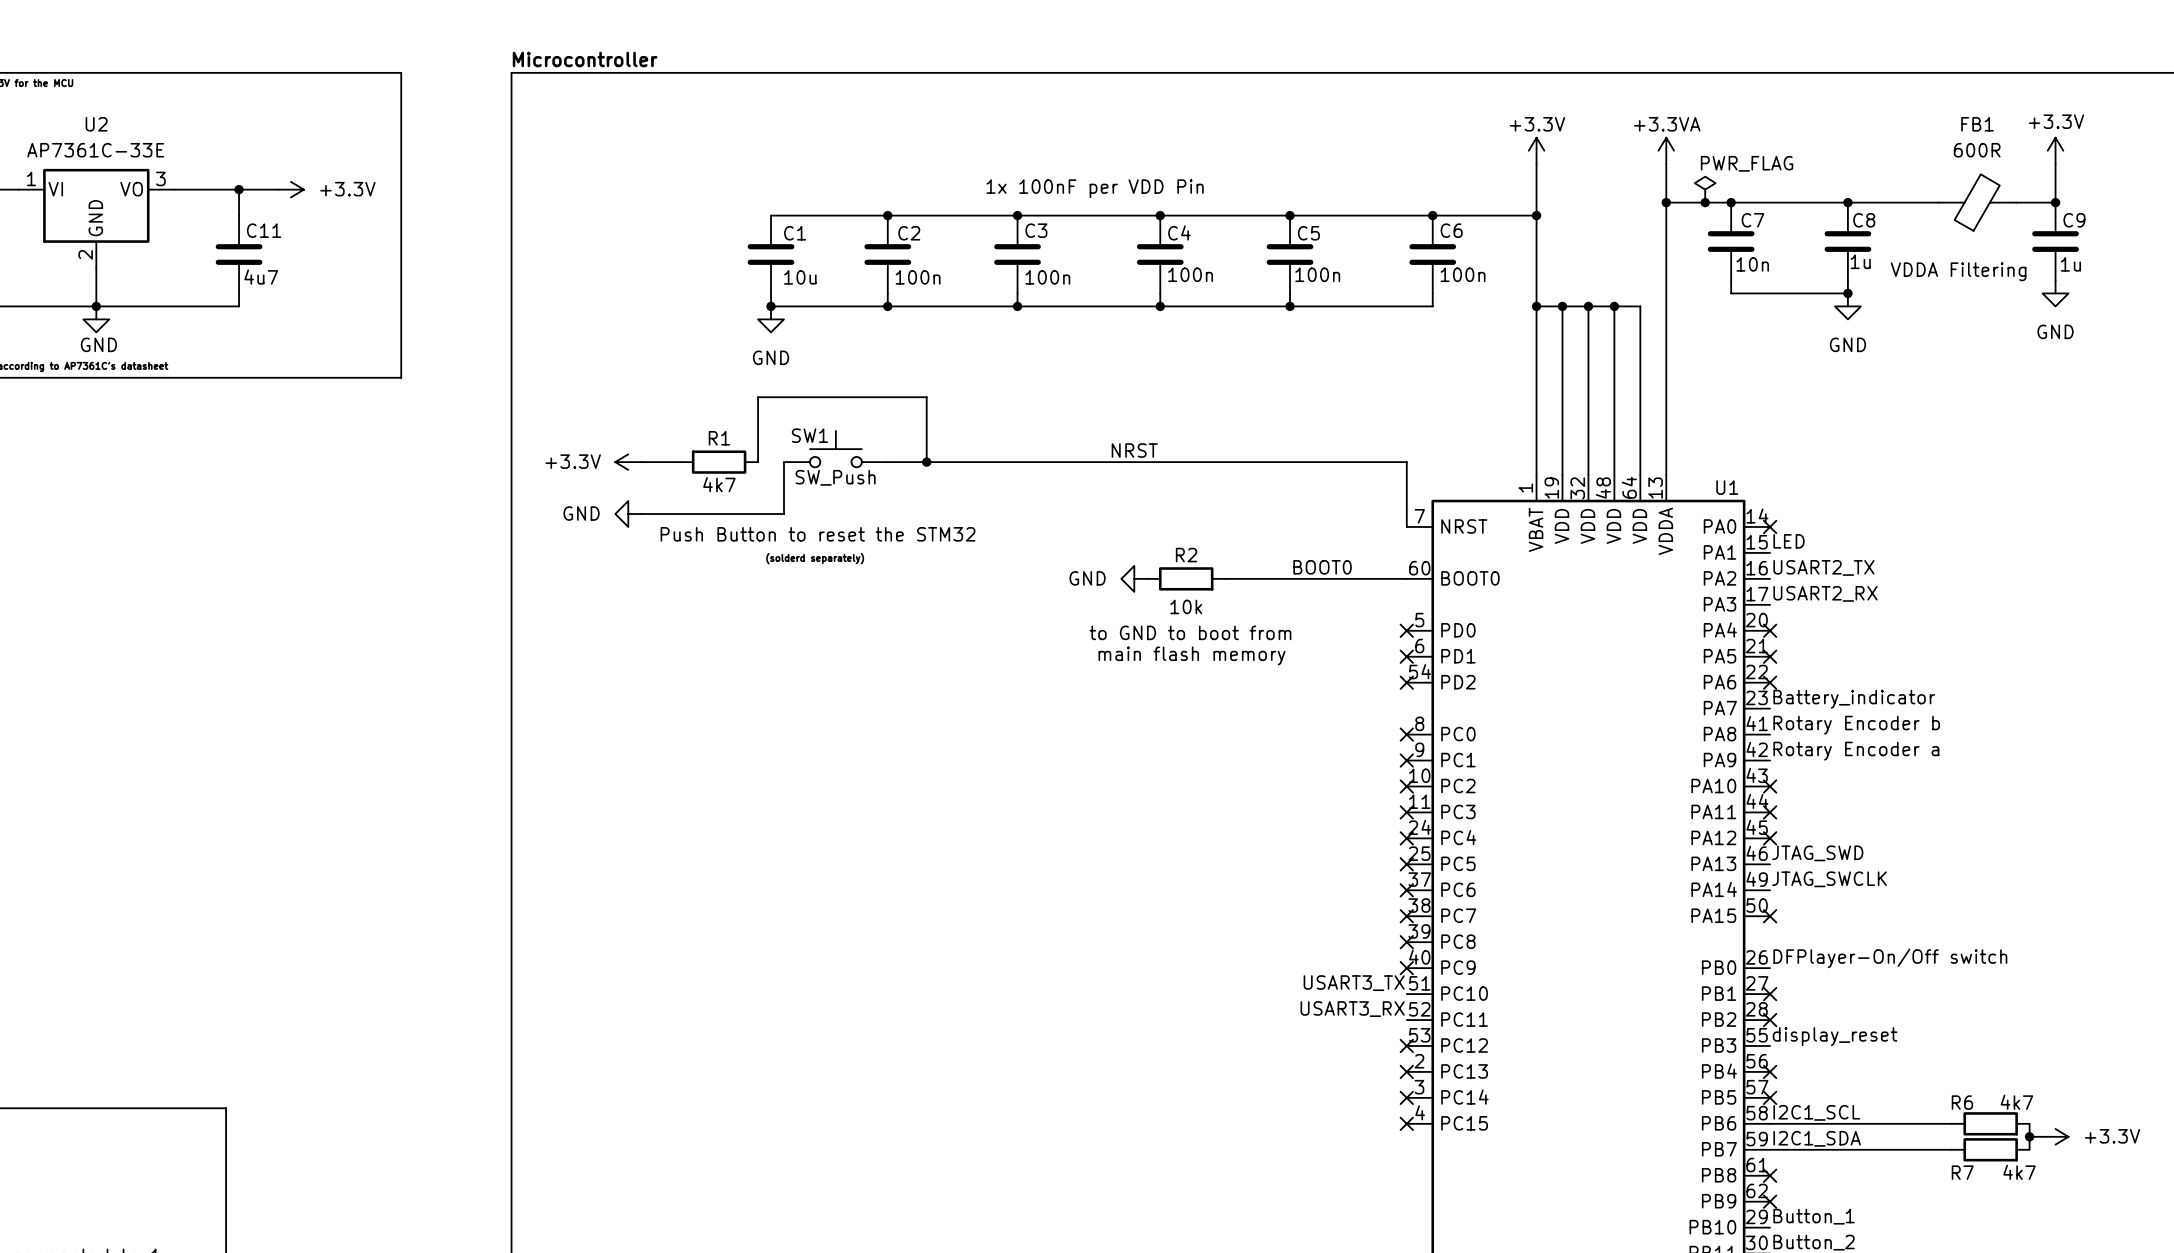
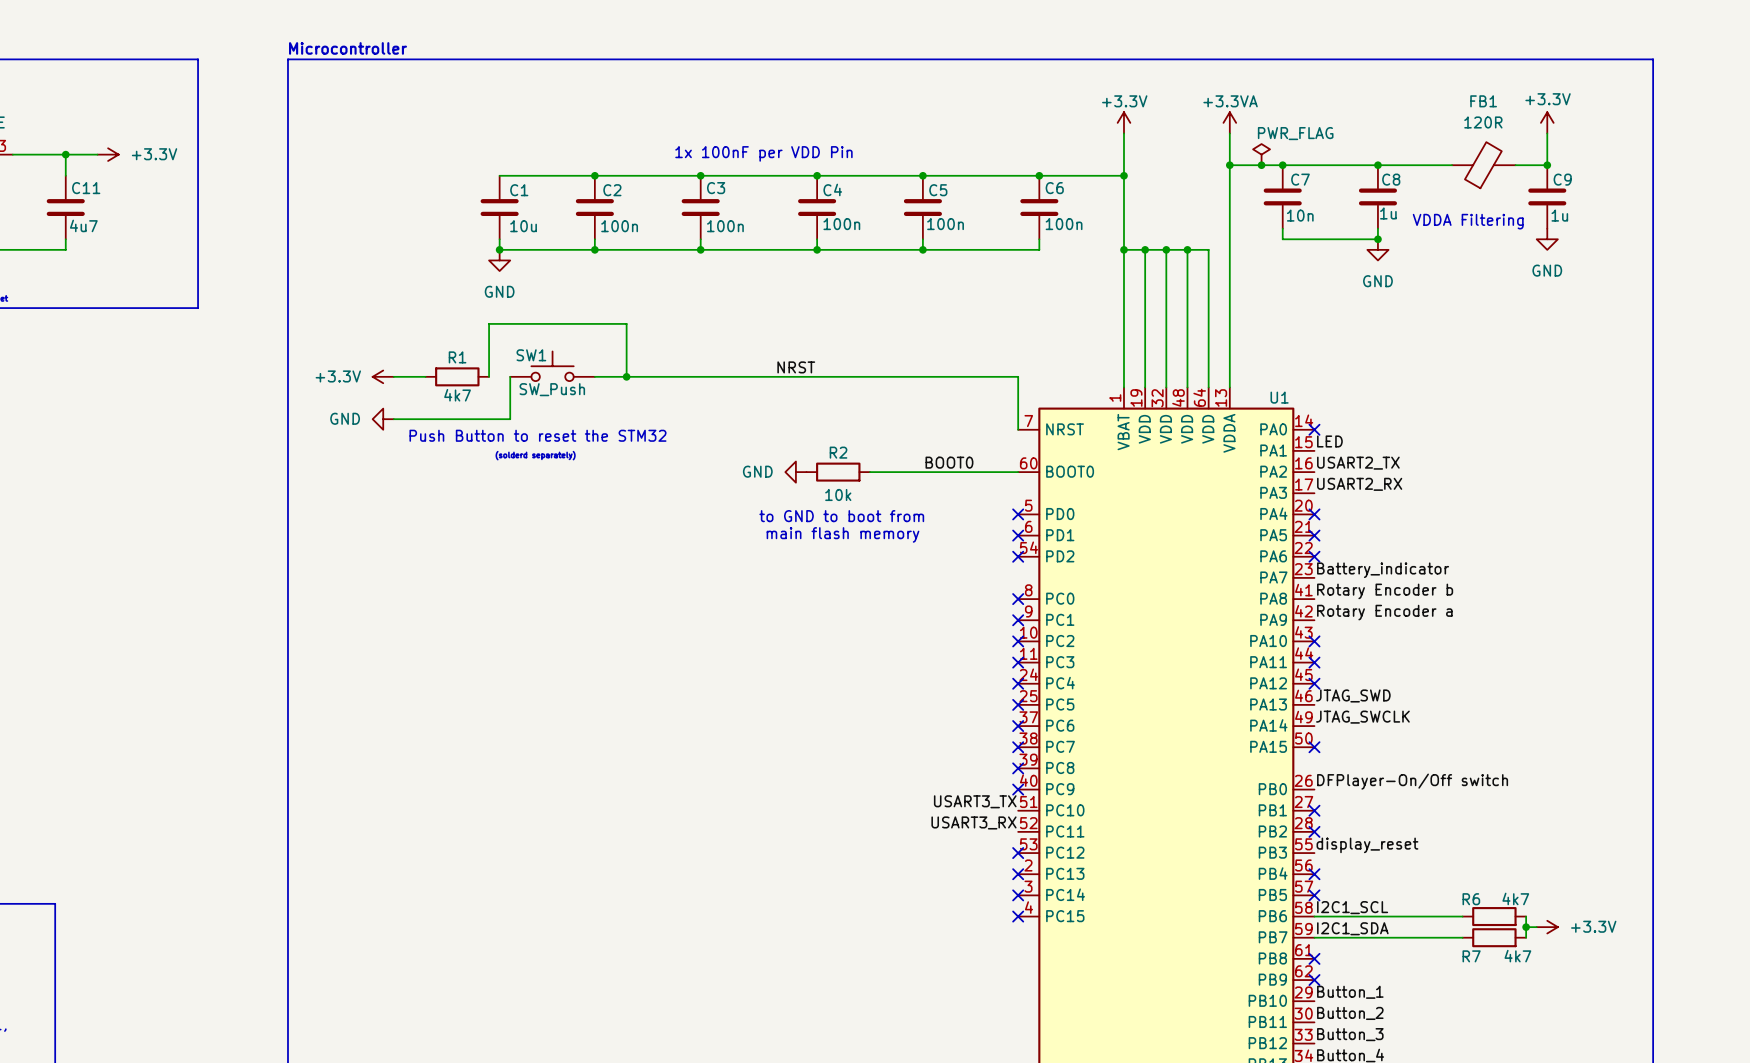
FB1 value: 600R (1977, 150) -> 120R (1483, 122)

